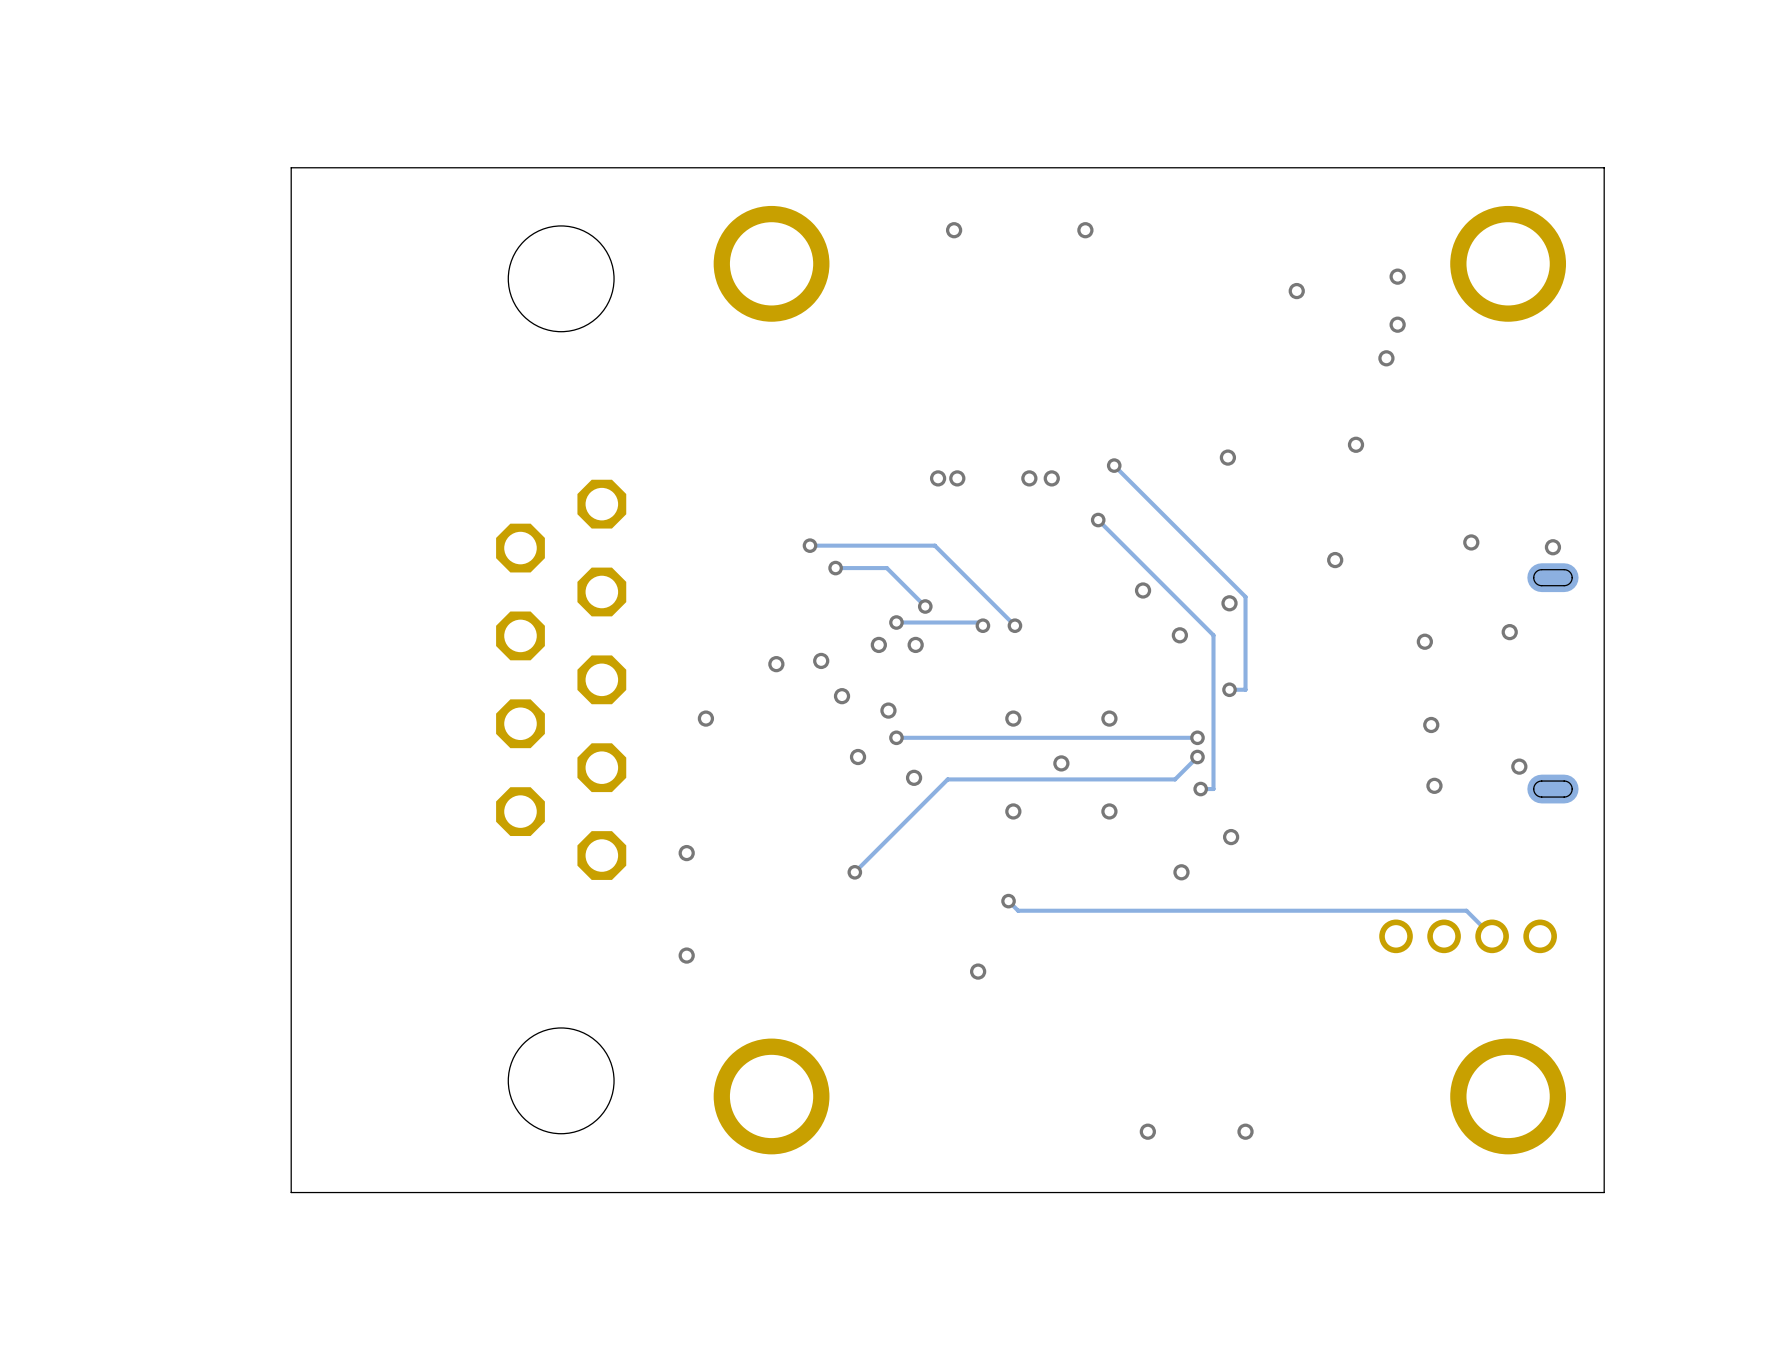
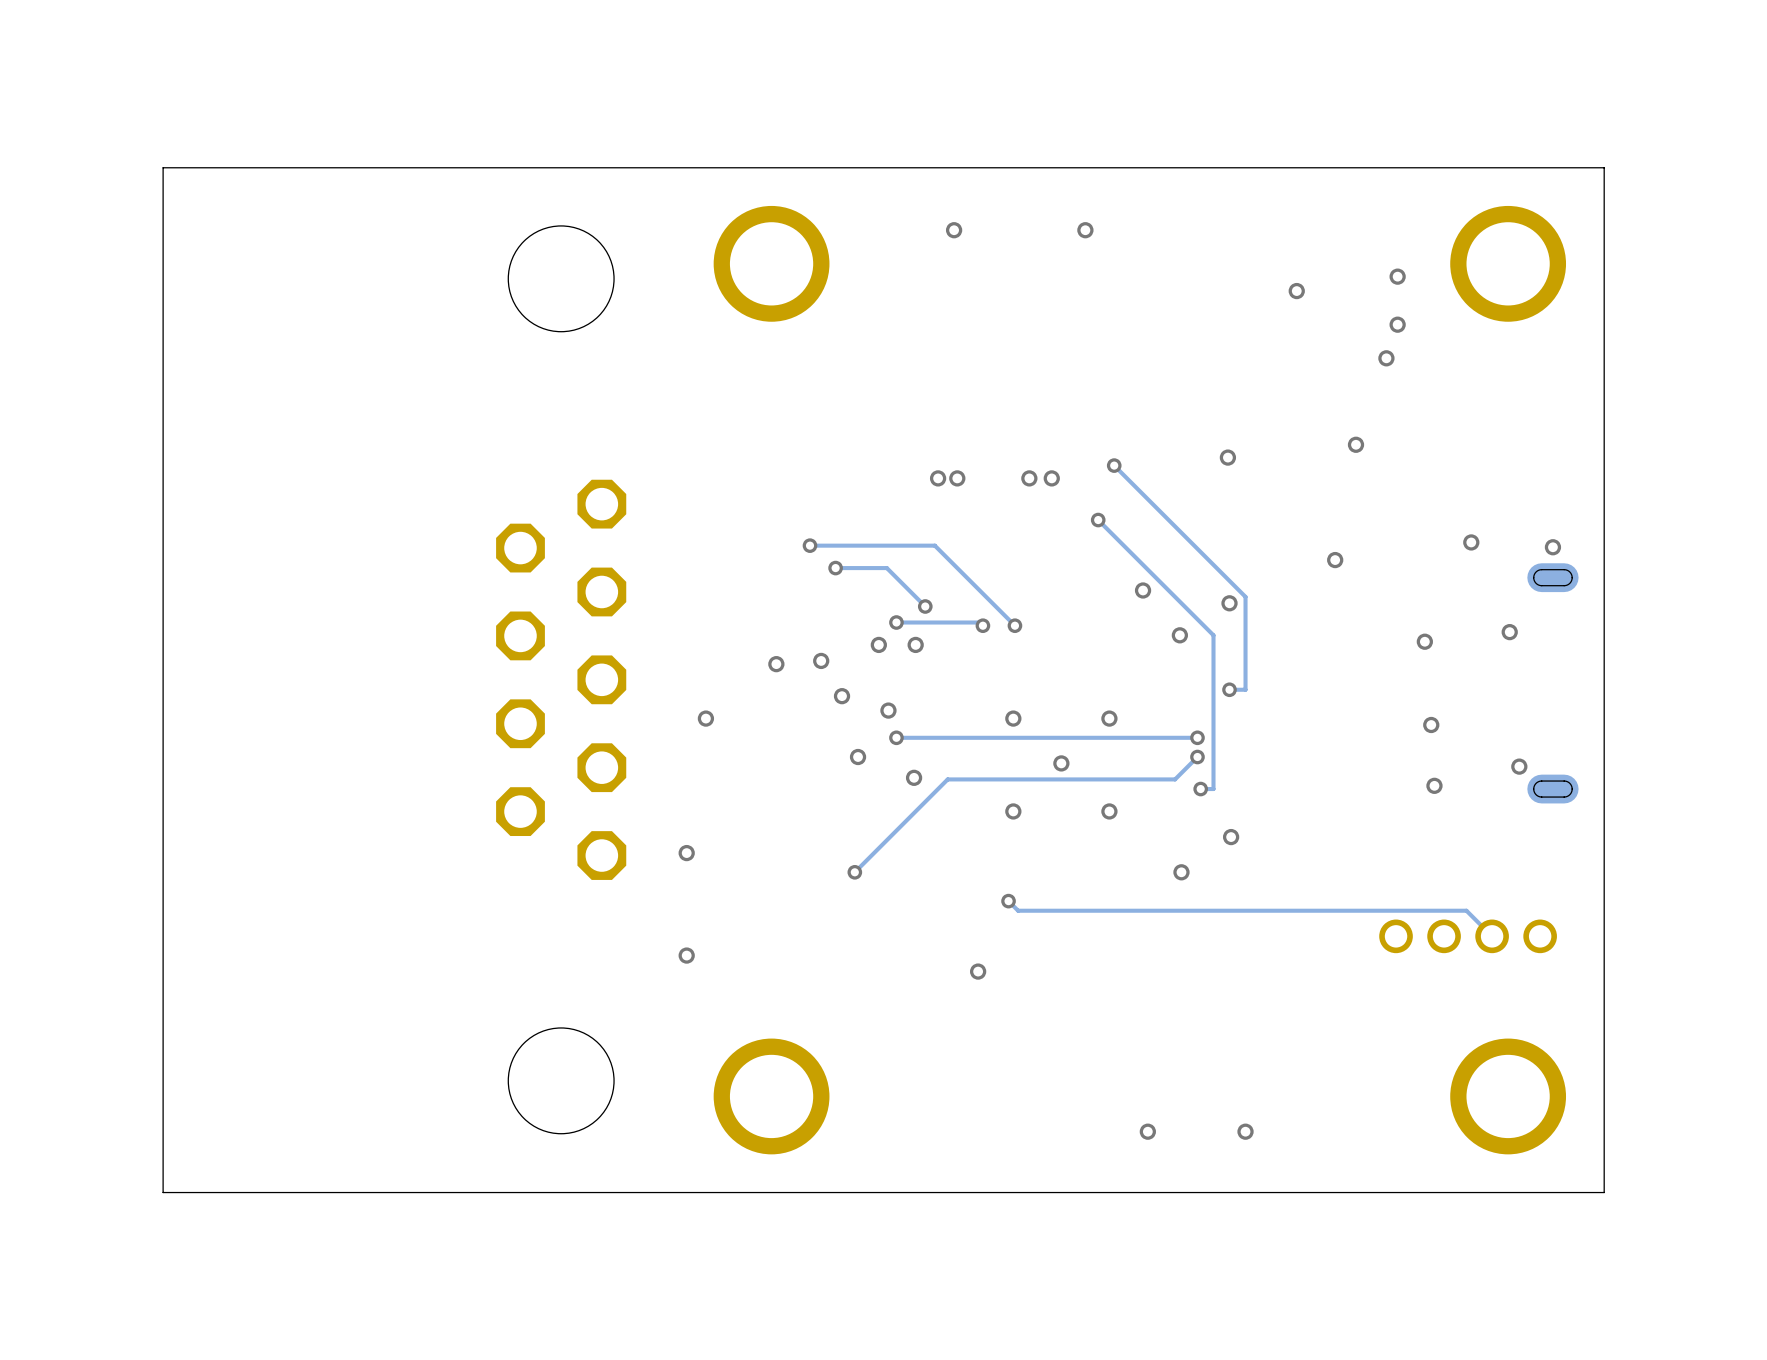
board edge: (291, 167) (291, 1192) -> (291, 167) (163, 167) (163, 1192) (291, 1192)

